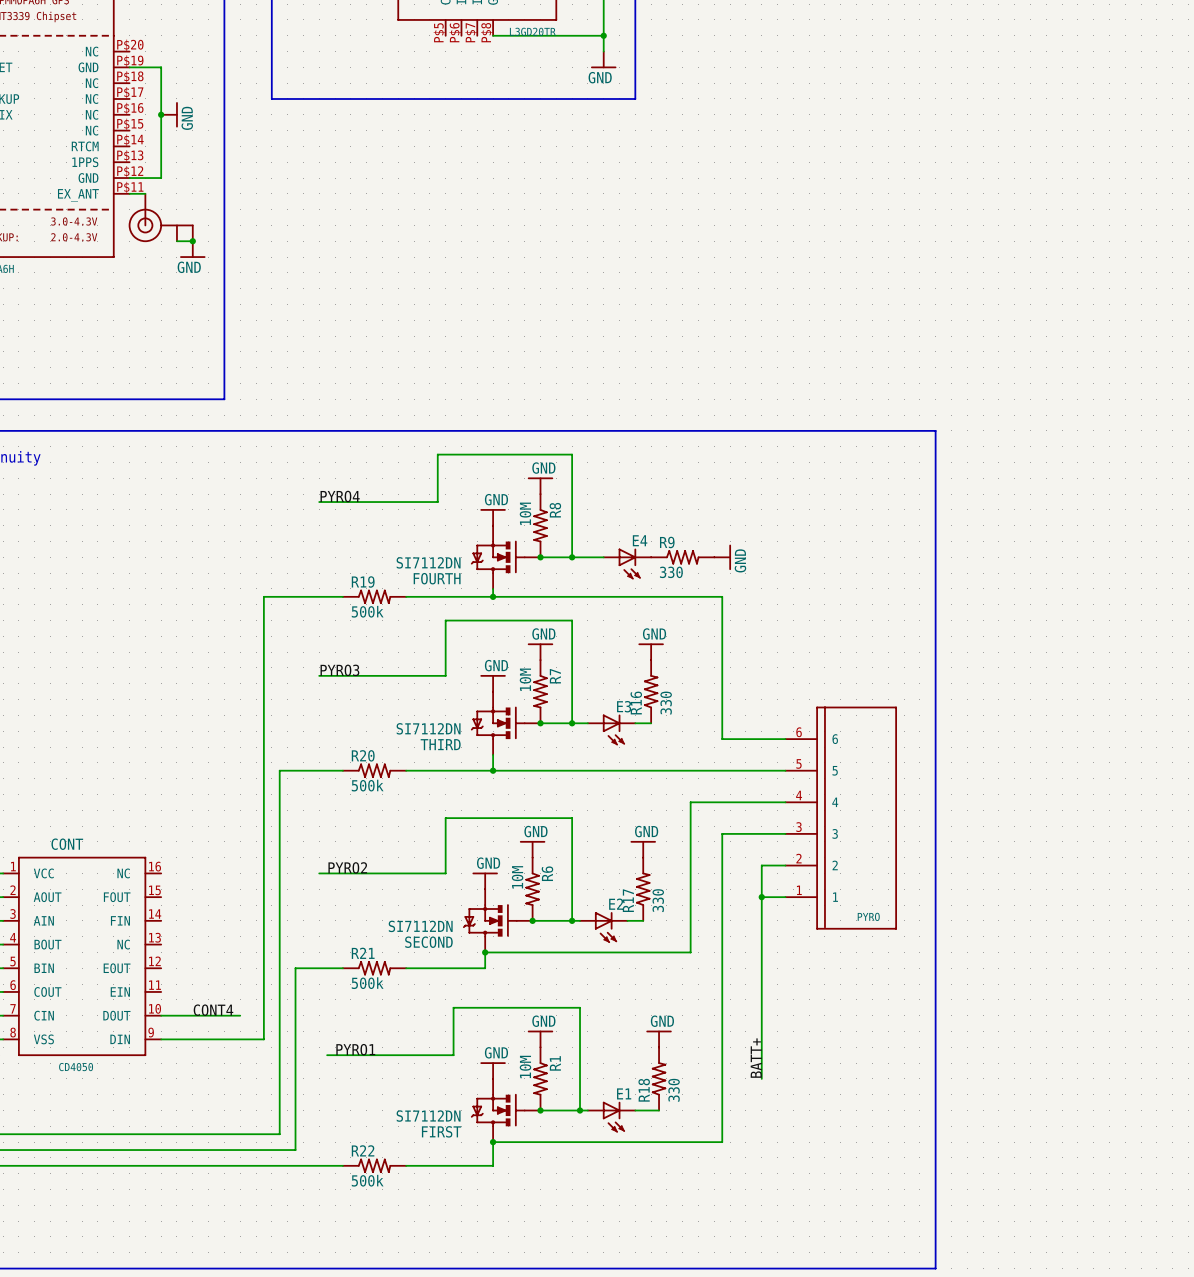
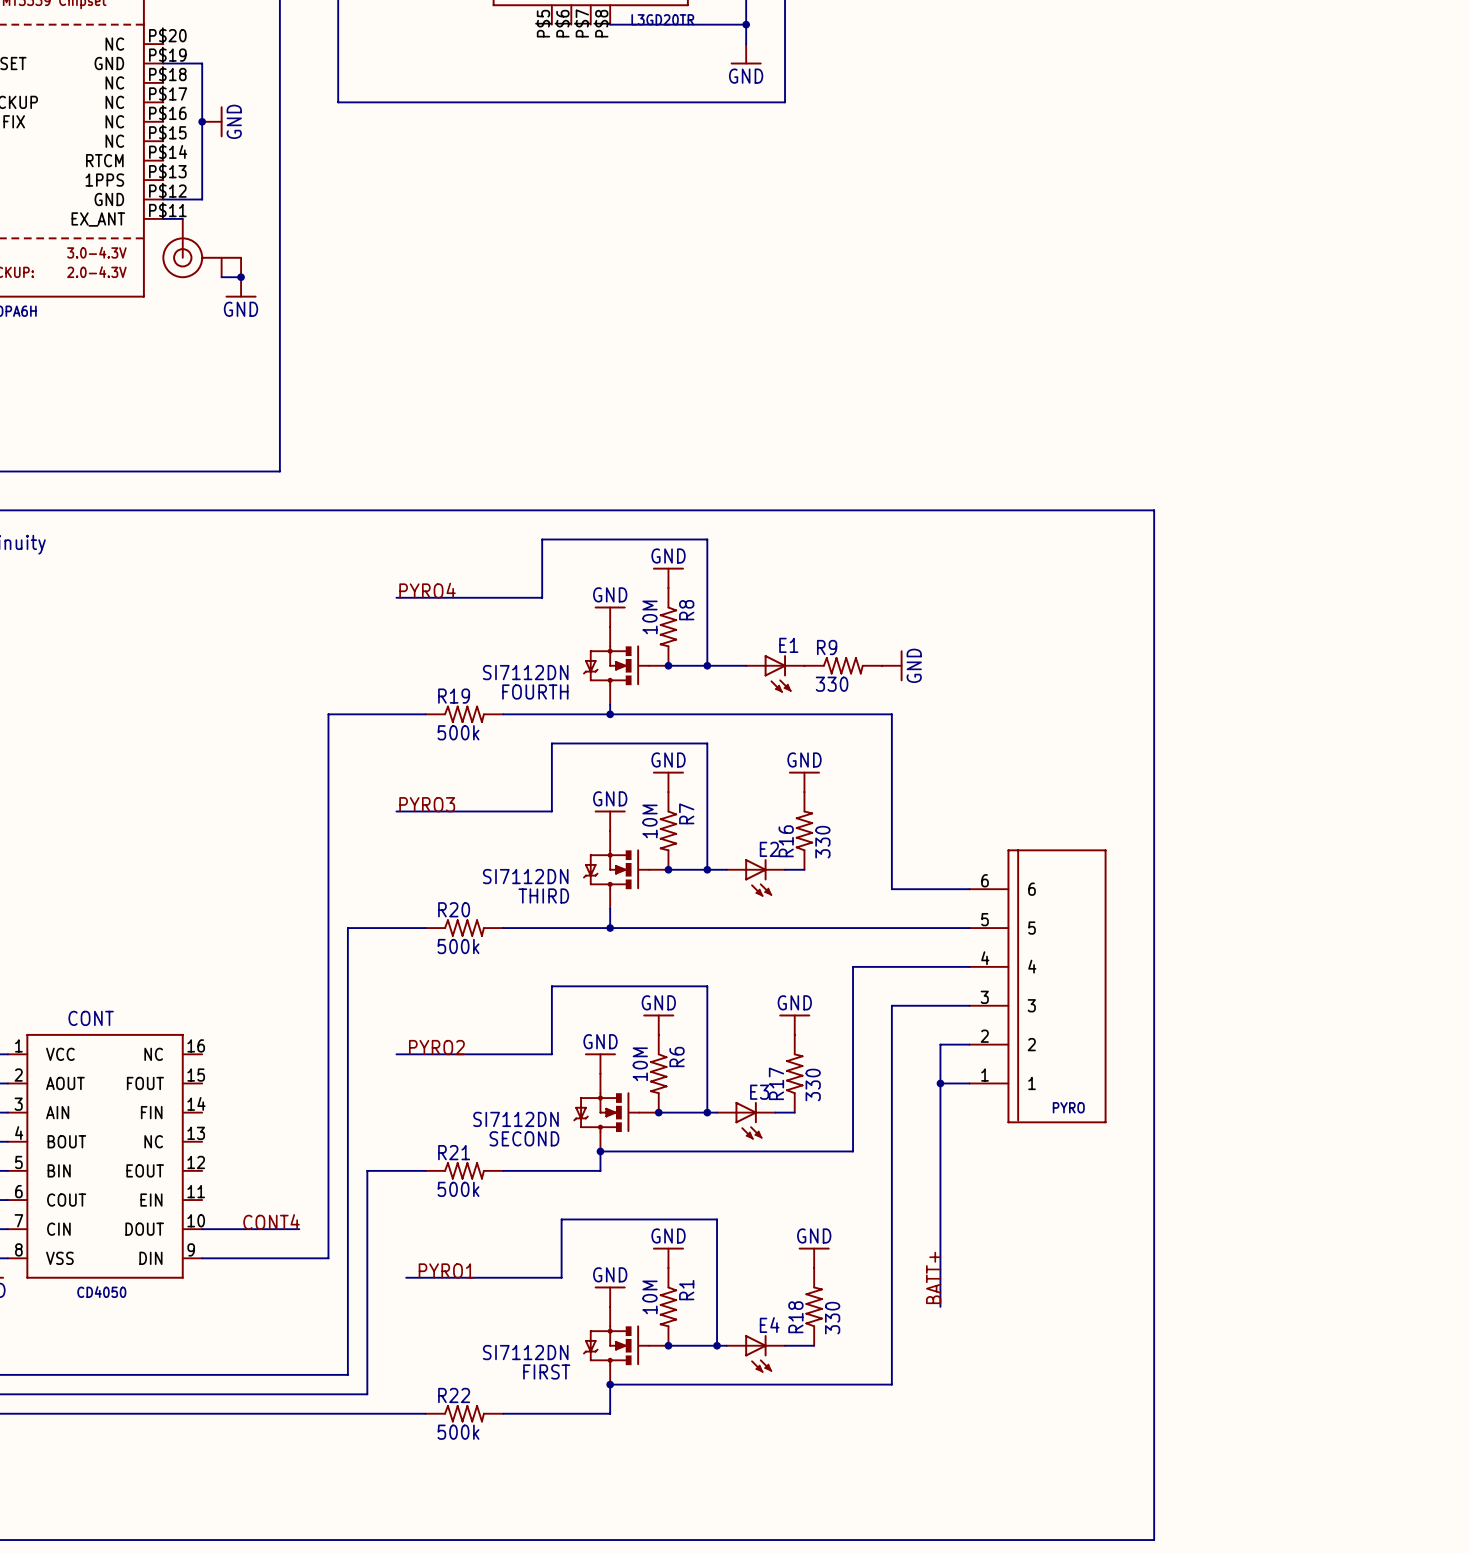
E4 name: E4 (640, 540) -> E1 (788, 645)
E3 name: E3 (624, 706) -> E2 (769, 849)
E2 name: E2 (616, 904) -> E3 (759, 1092)
E1 name: E1 (624, 1093) -> E4 (769, 1325)

